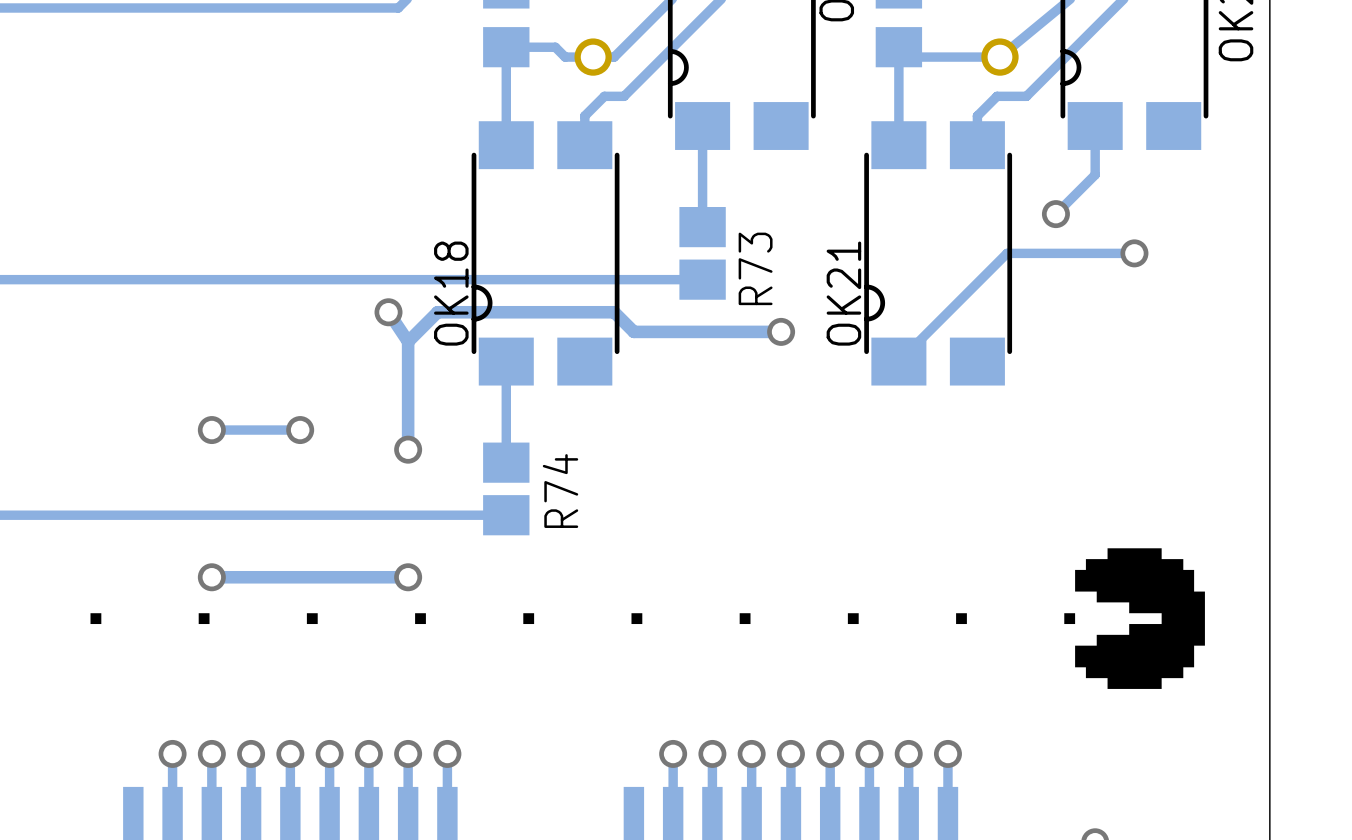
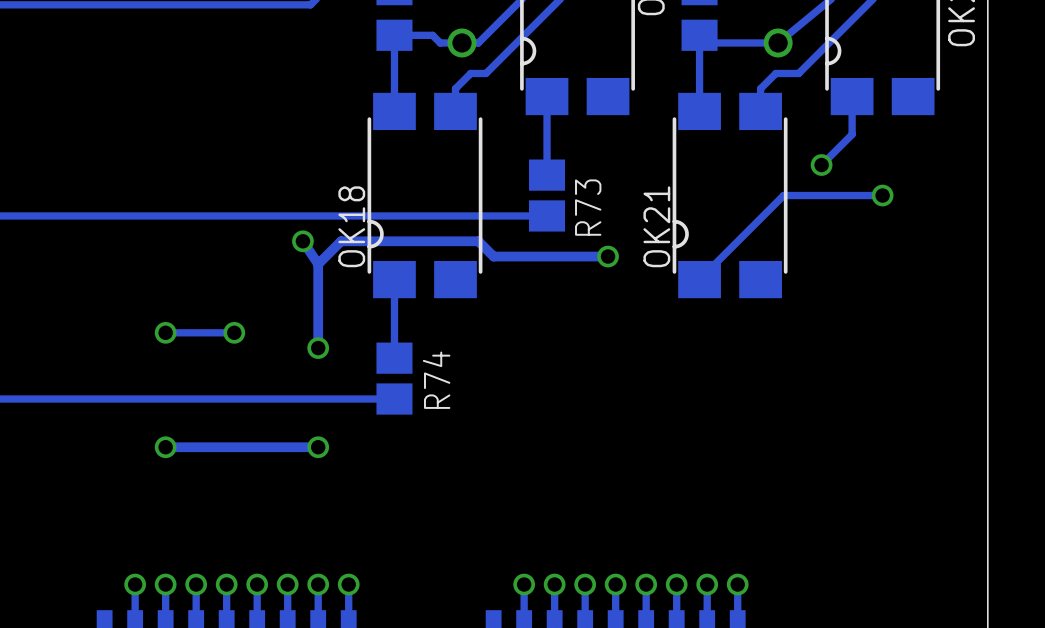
drawing: [1064, 548, 1205, 689] -> none
drawing: [90, 613, 102, 625] -> none
drawing: [198, 613, 210, 625] -> none
drawing: [306, 613, 318, 625] -> none
drawing: [415, 613, 426, 625] -> none
drawing: [523, 613, 535, 625] -> none
drawing: [631, 613, 643, 625] -> none
drawing: [739, 613, 751, 625] -> none
drawing: [847, 613, 859, 625] -> none
drawing: [956, 613, 967, 625] -> none

